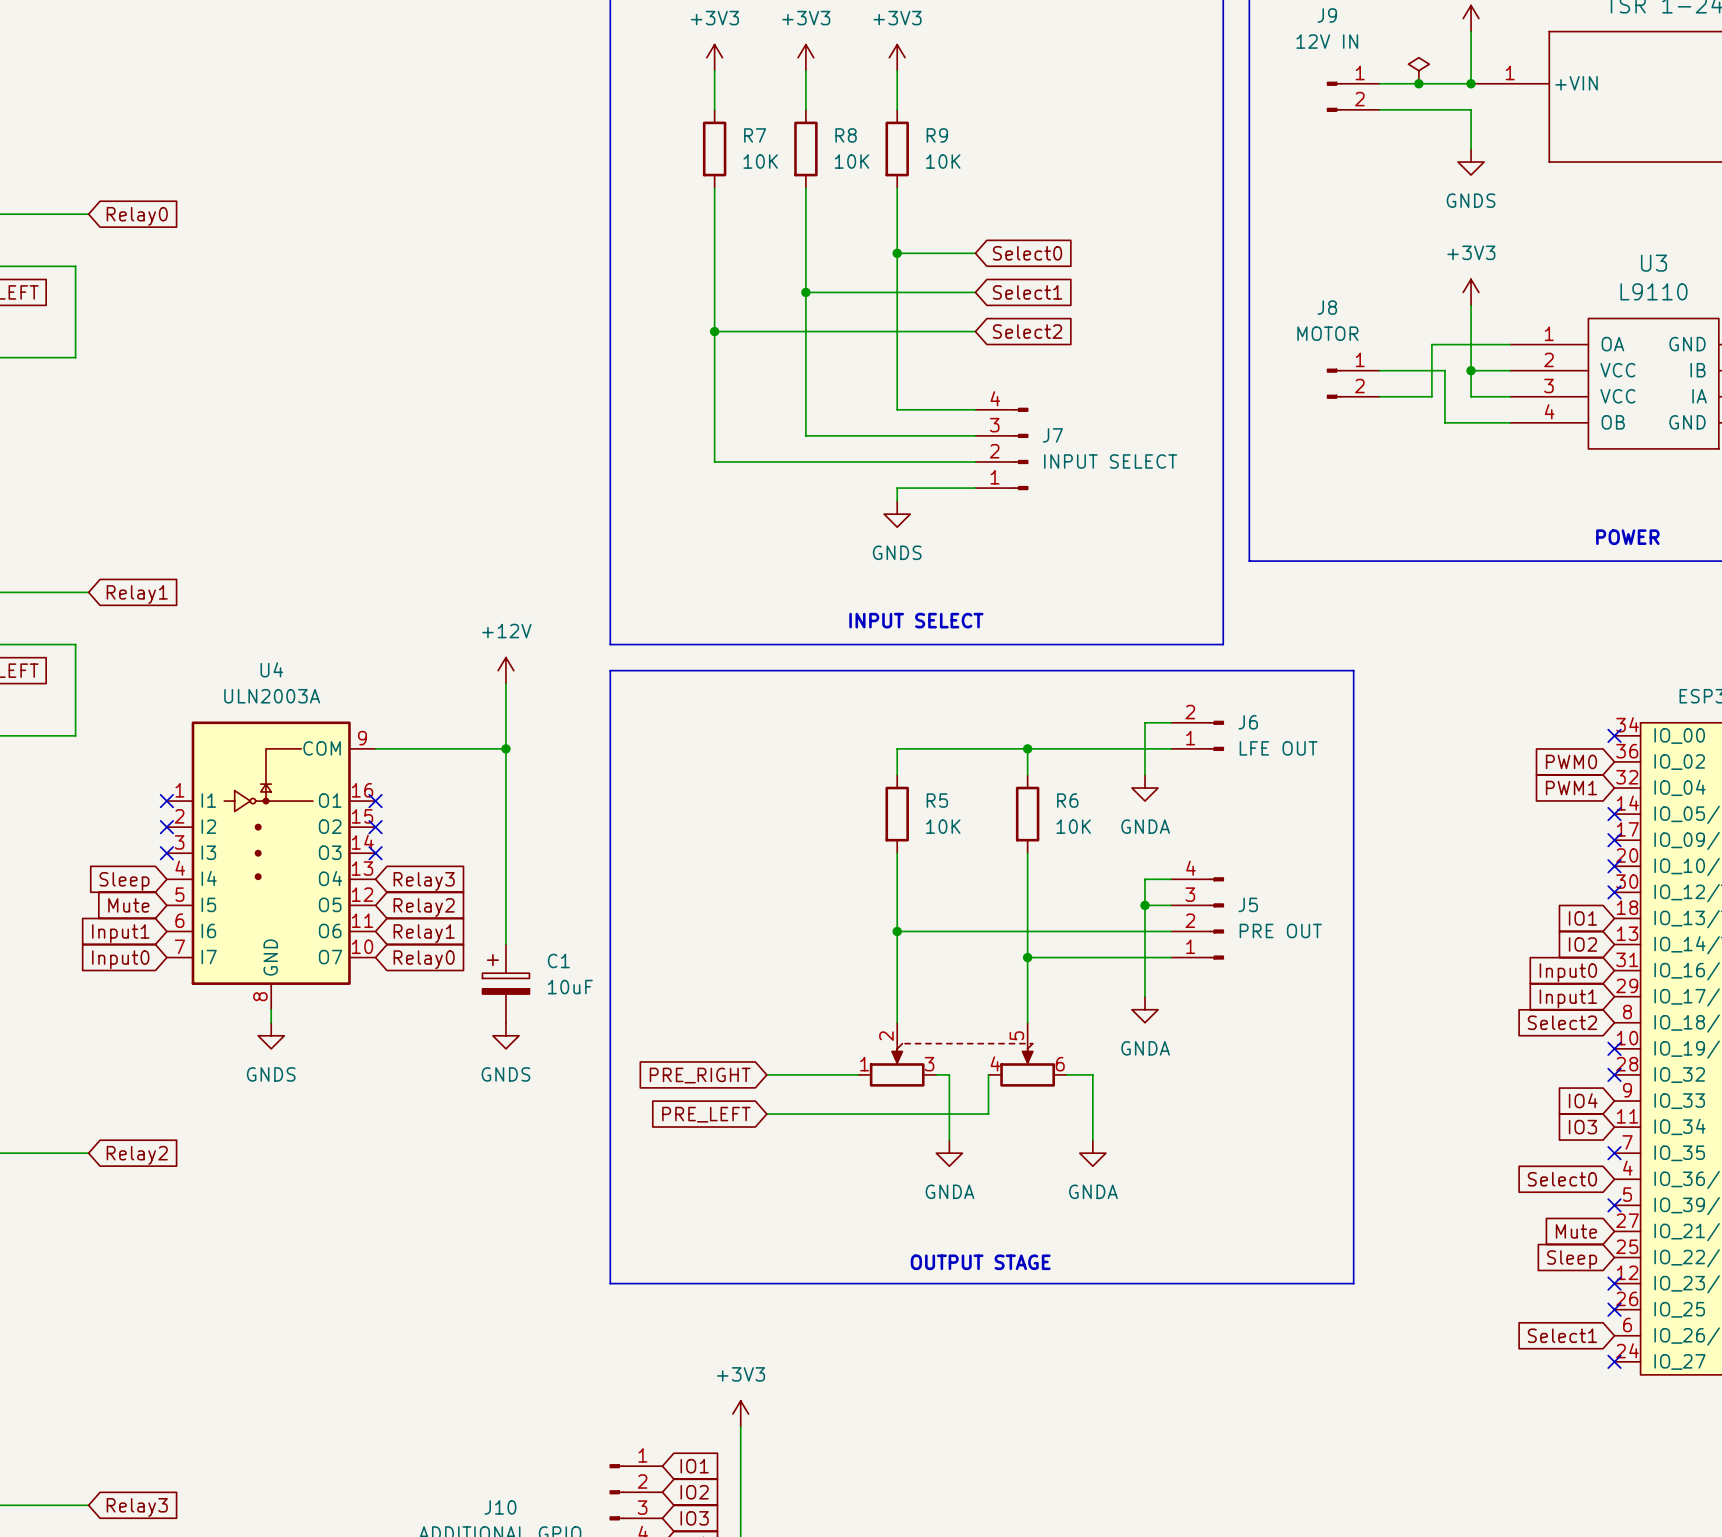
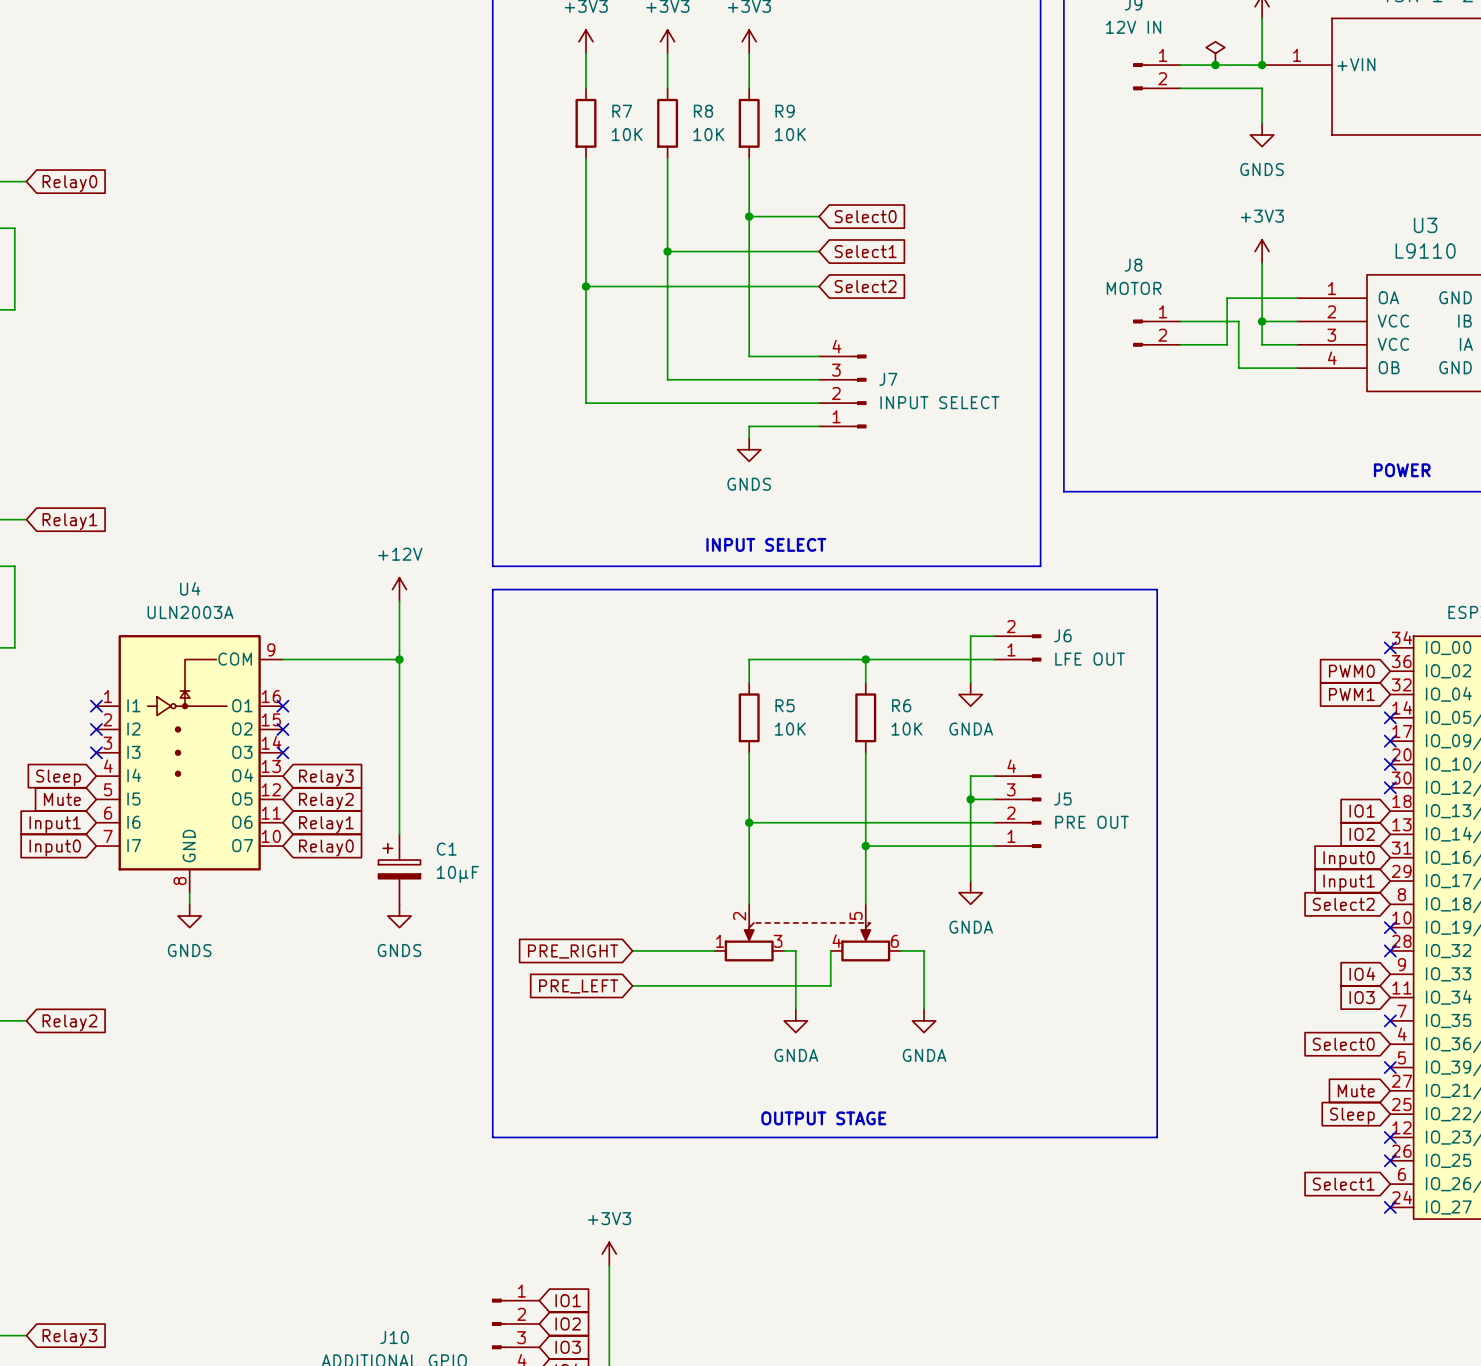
C1 value: 10uF (570, 987) -> 10µF (457, 874)

